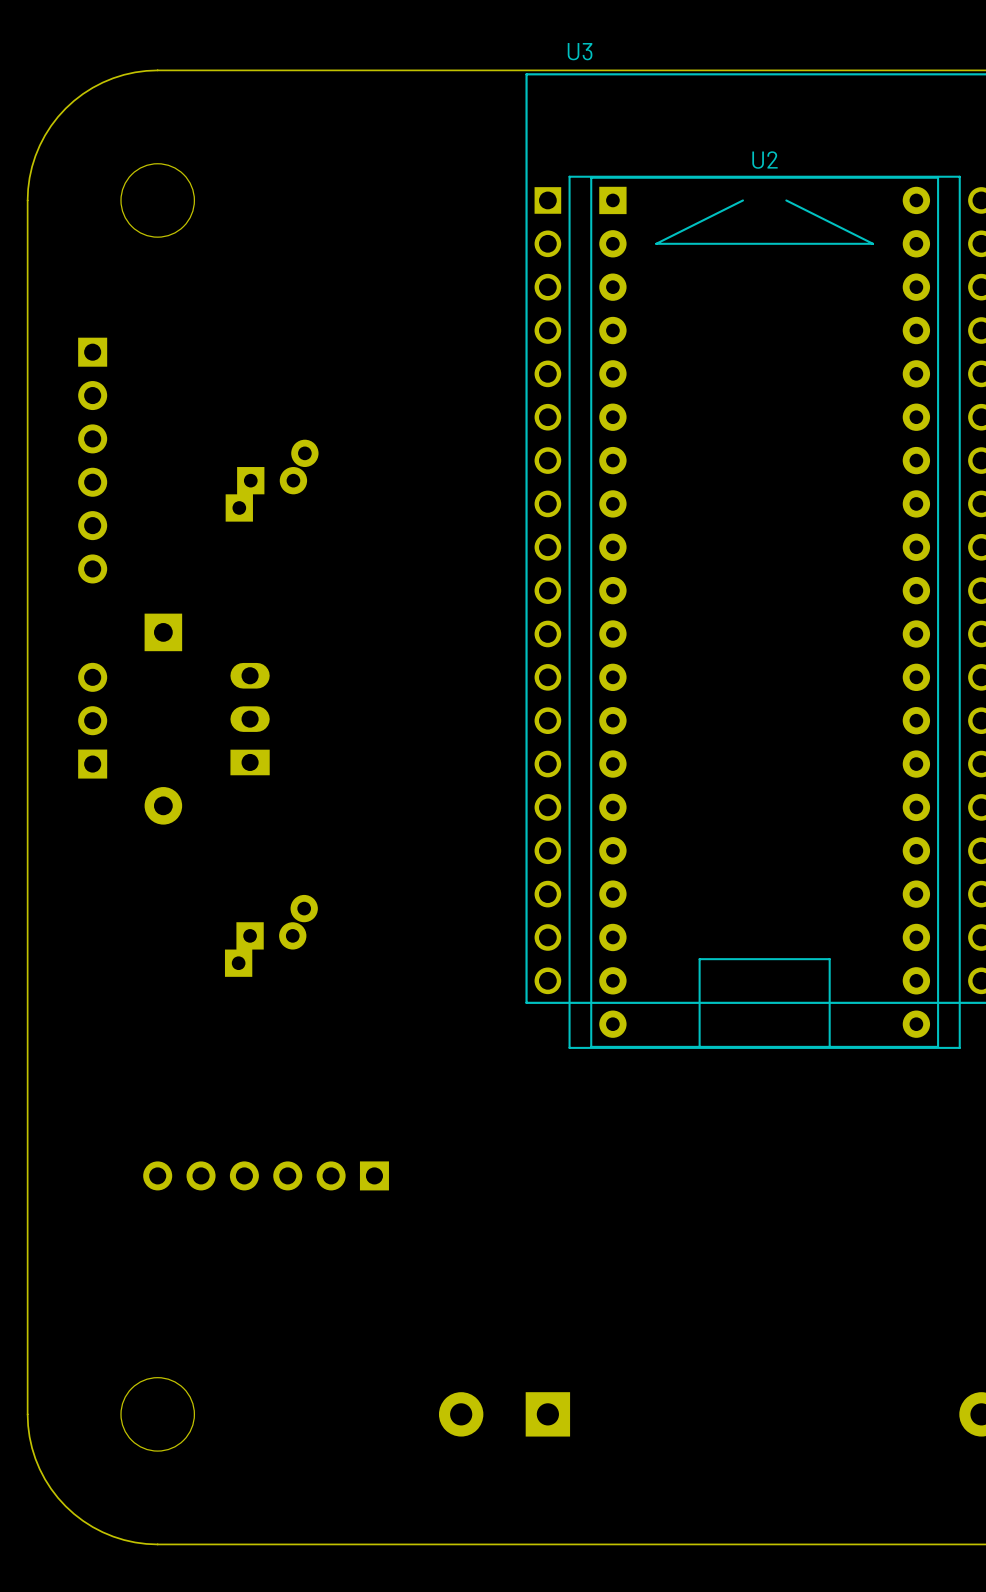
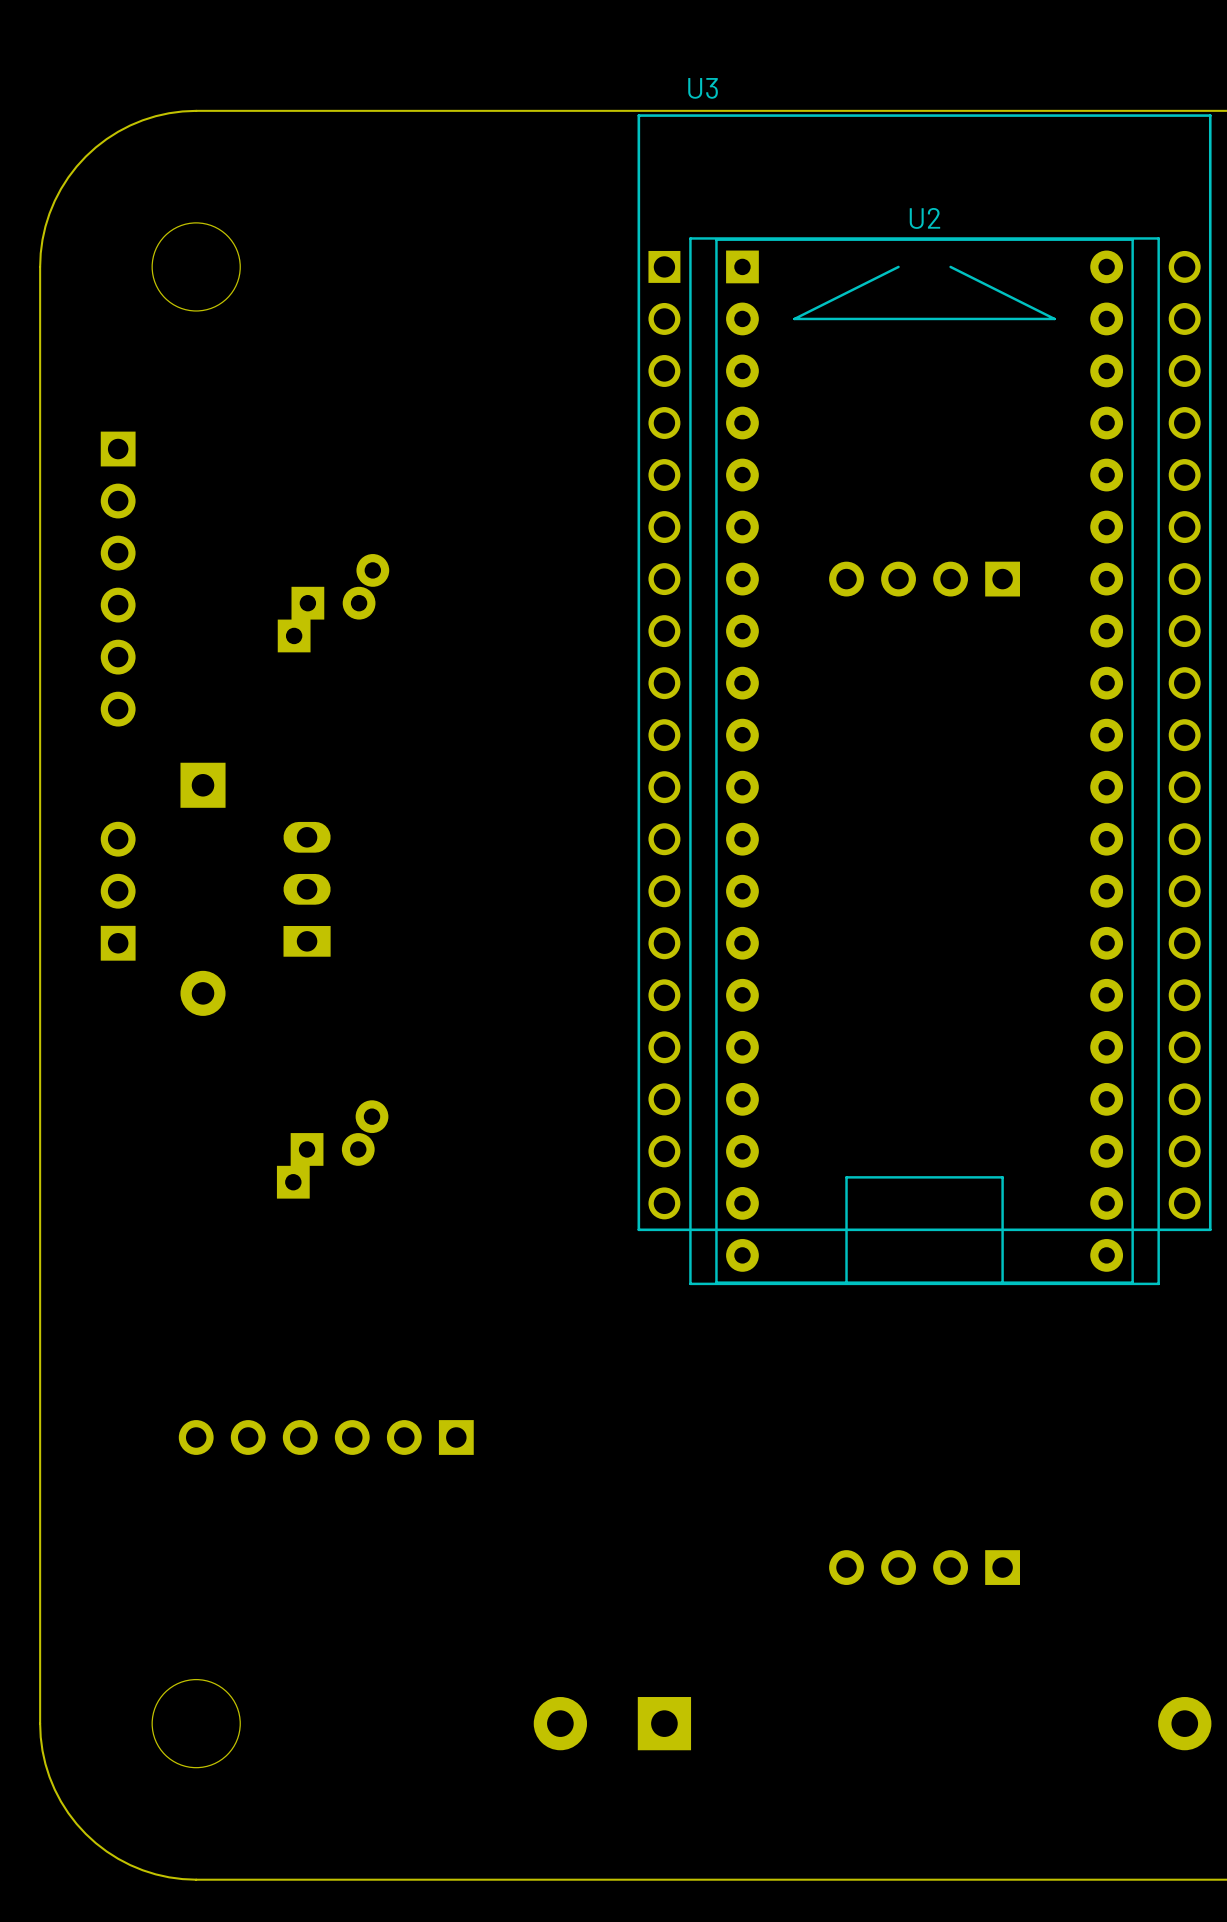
part: none -> (924, 579)
part: none -> (924, 1567)

